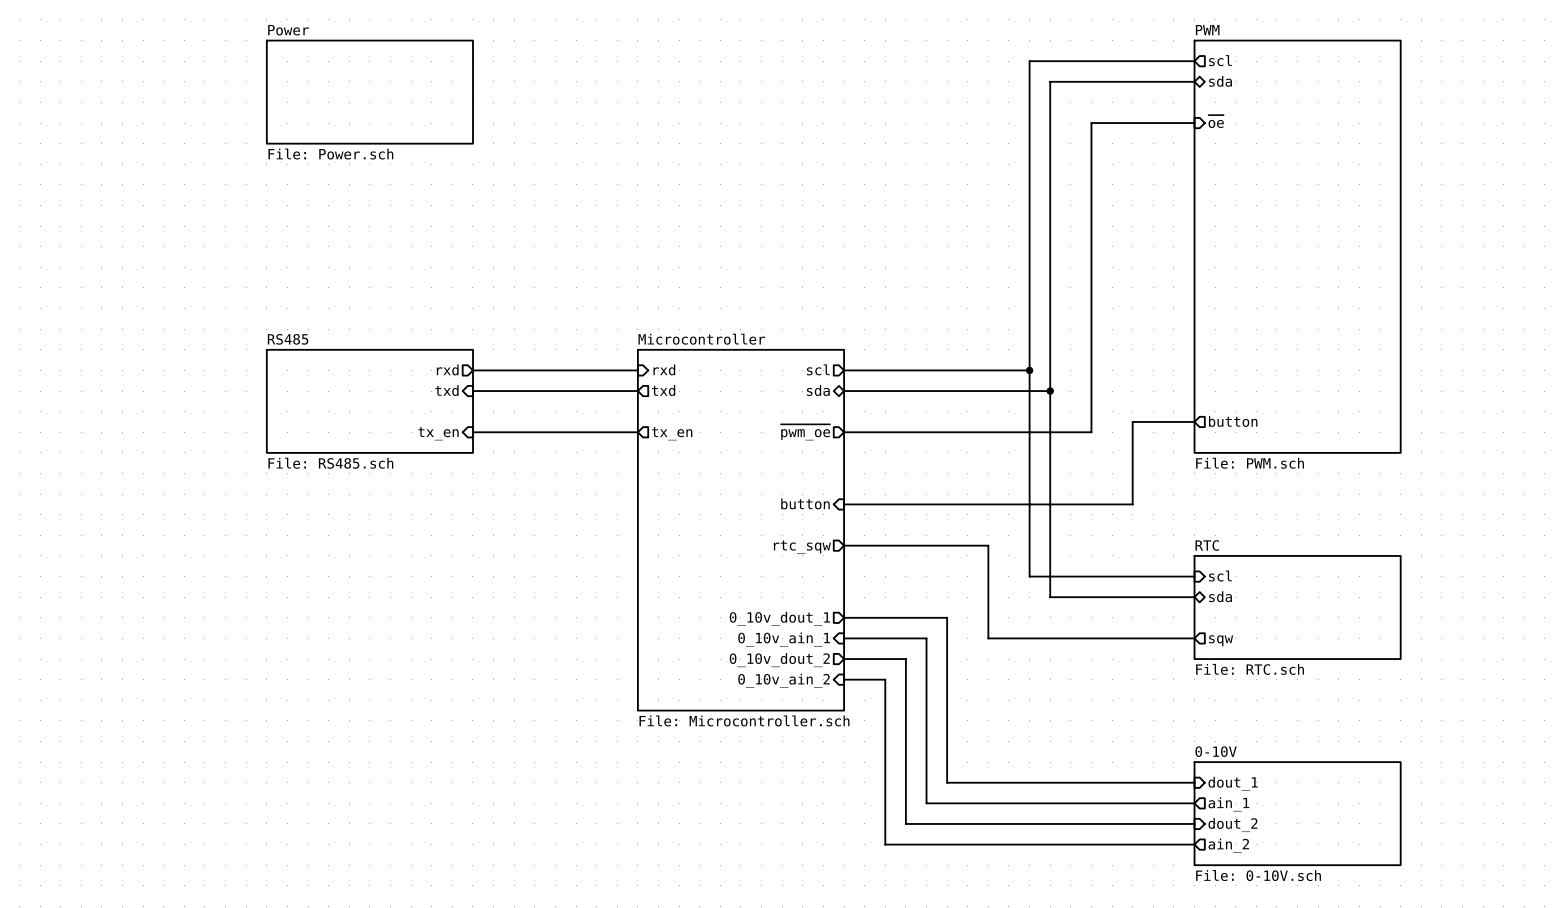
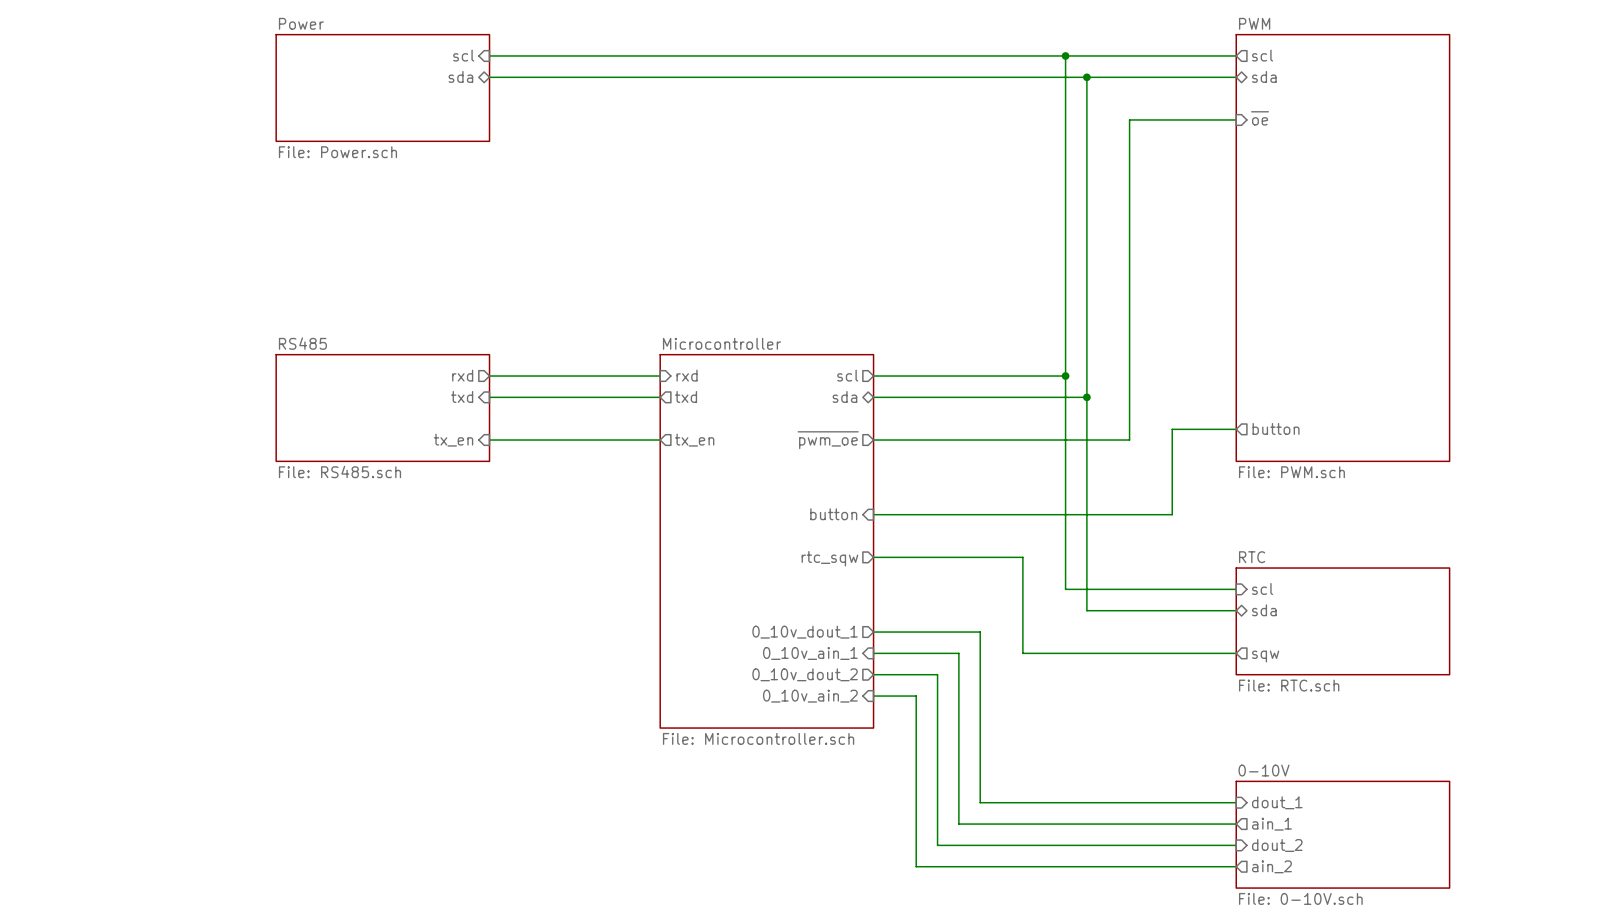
sheet pin: none -> scl (463, 55)
wire: none -> (489, 55) (1065, 55)
junction: none -> (1065, 55)
sheet pin: none -> sda (460, 76)
wire: none -> (489, 77) (1086, 77)
junction: none -> (1086, 77)

